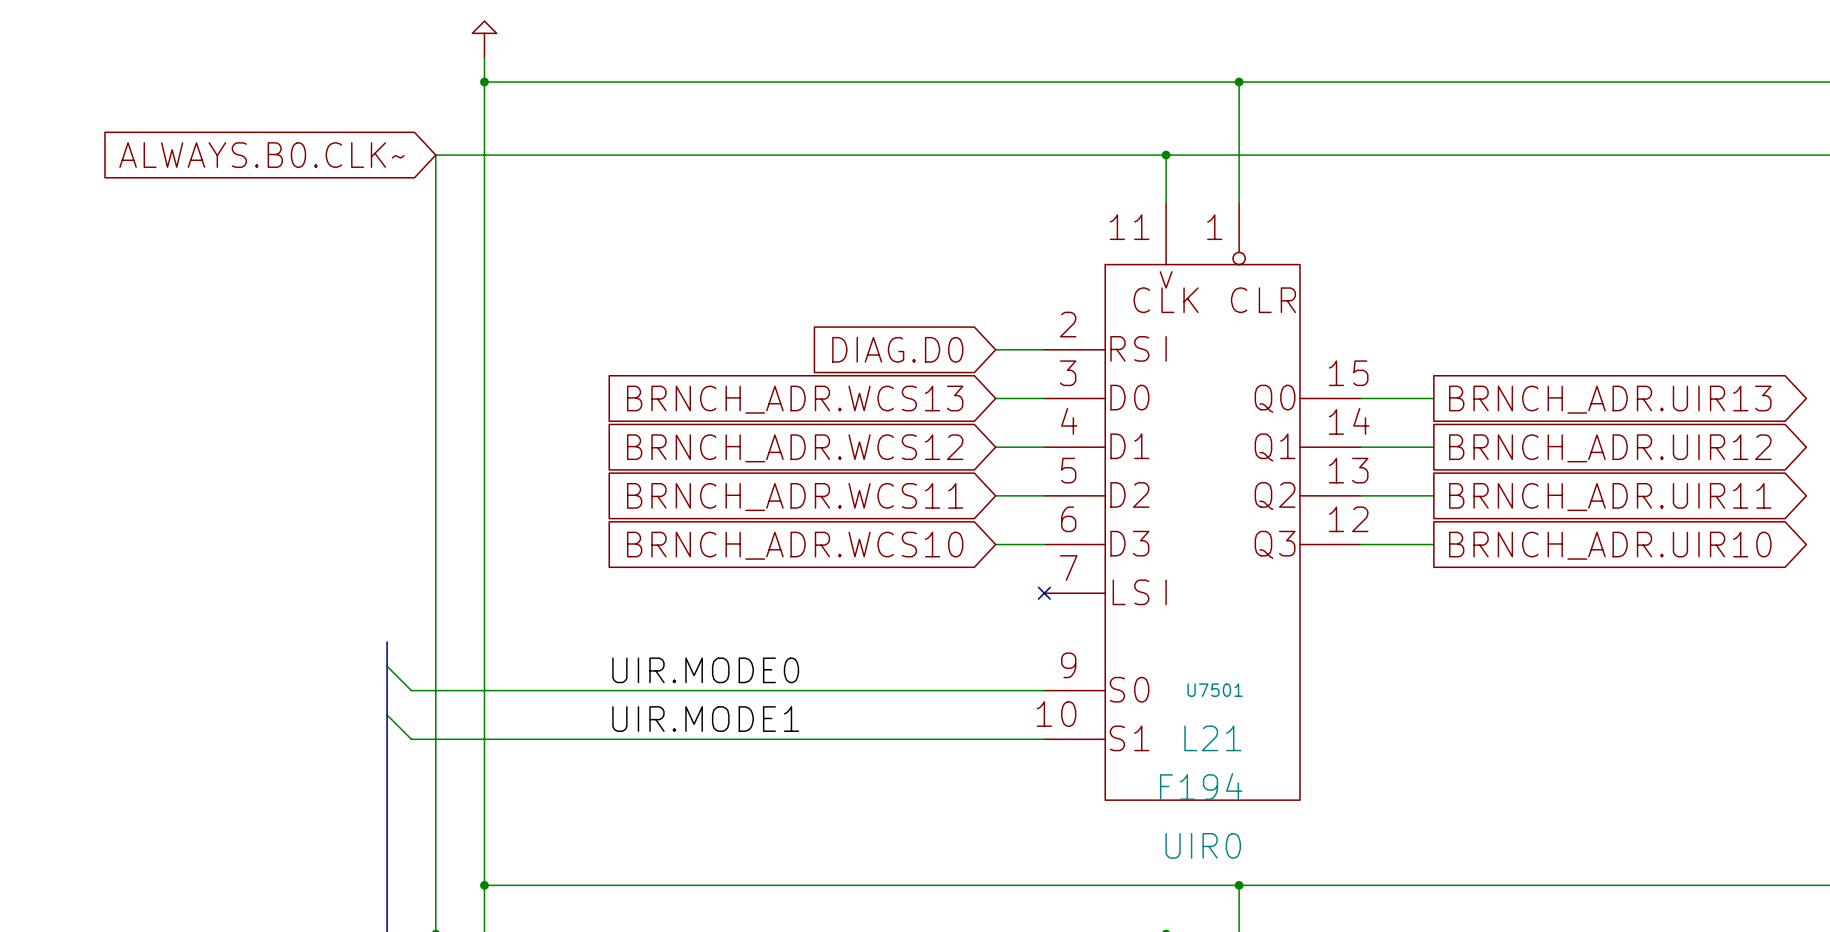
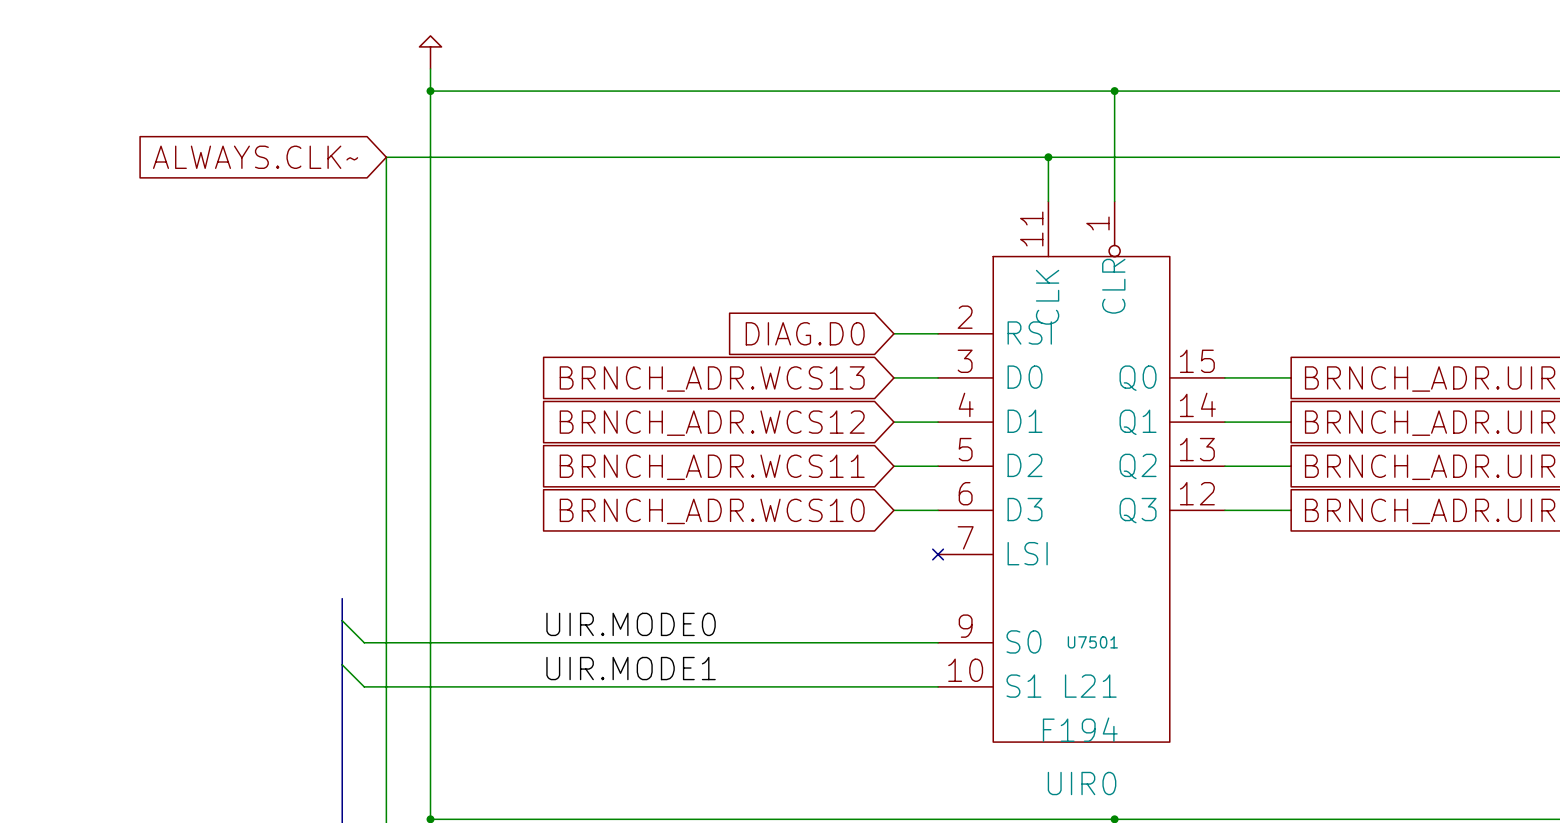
global label: ALWAYS.B0.CLK~ (261, 155) -> ALWAYS.CLK~ (255, 157)
U7501 symbol: [1044, 203, 1361, 801] -> [938, 201, 1225, 743]

